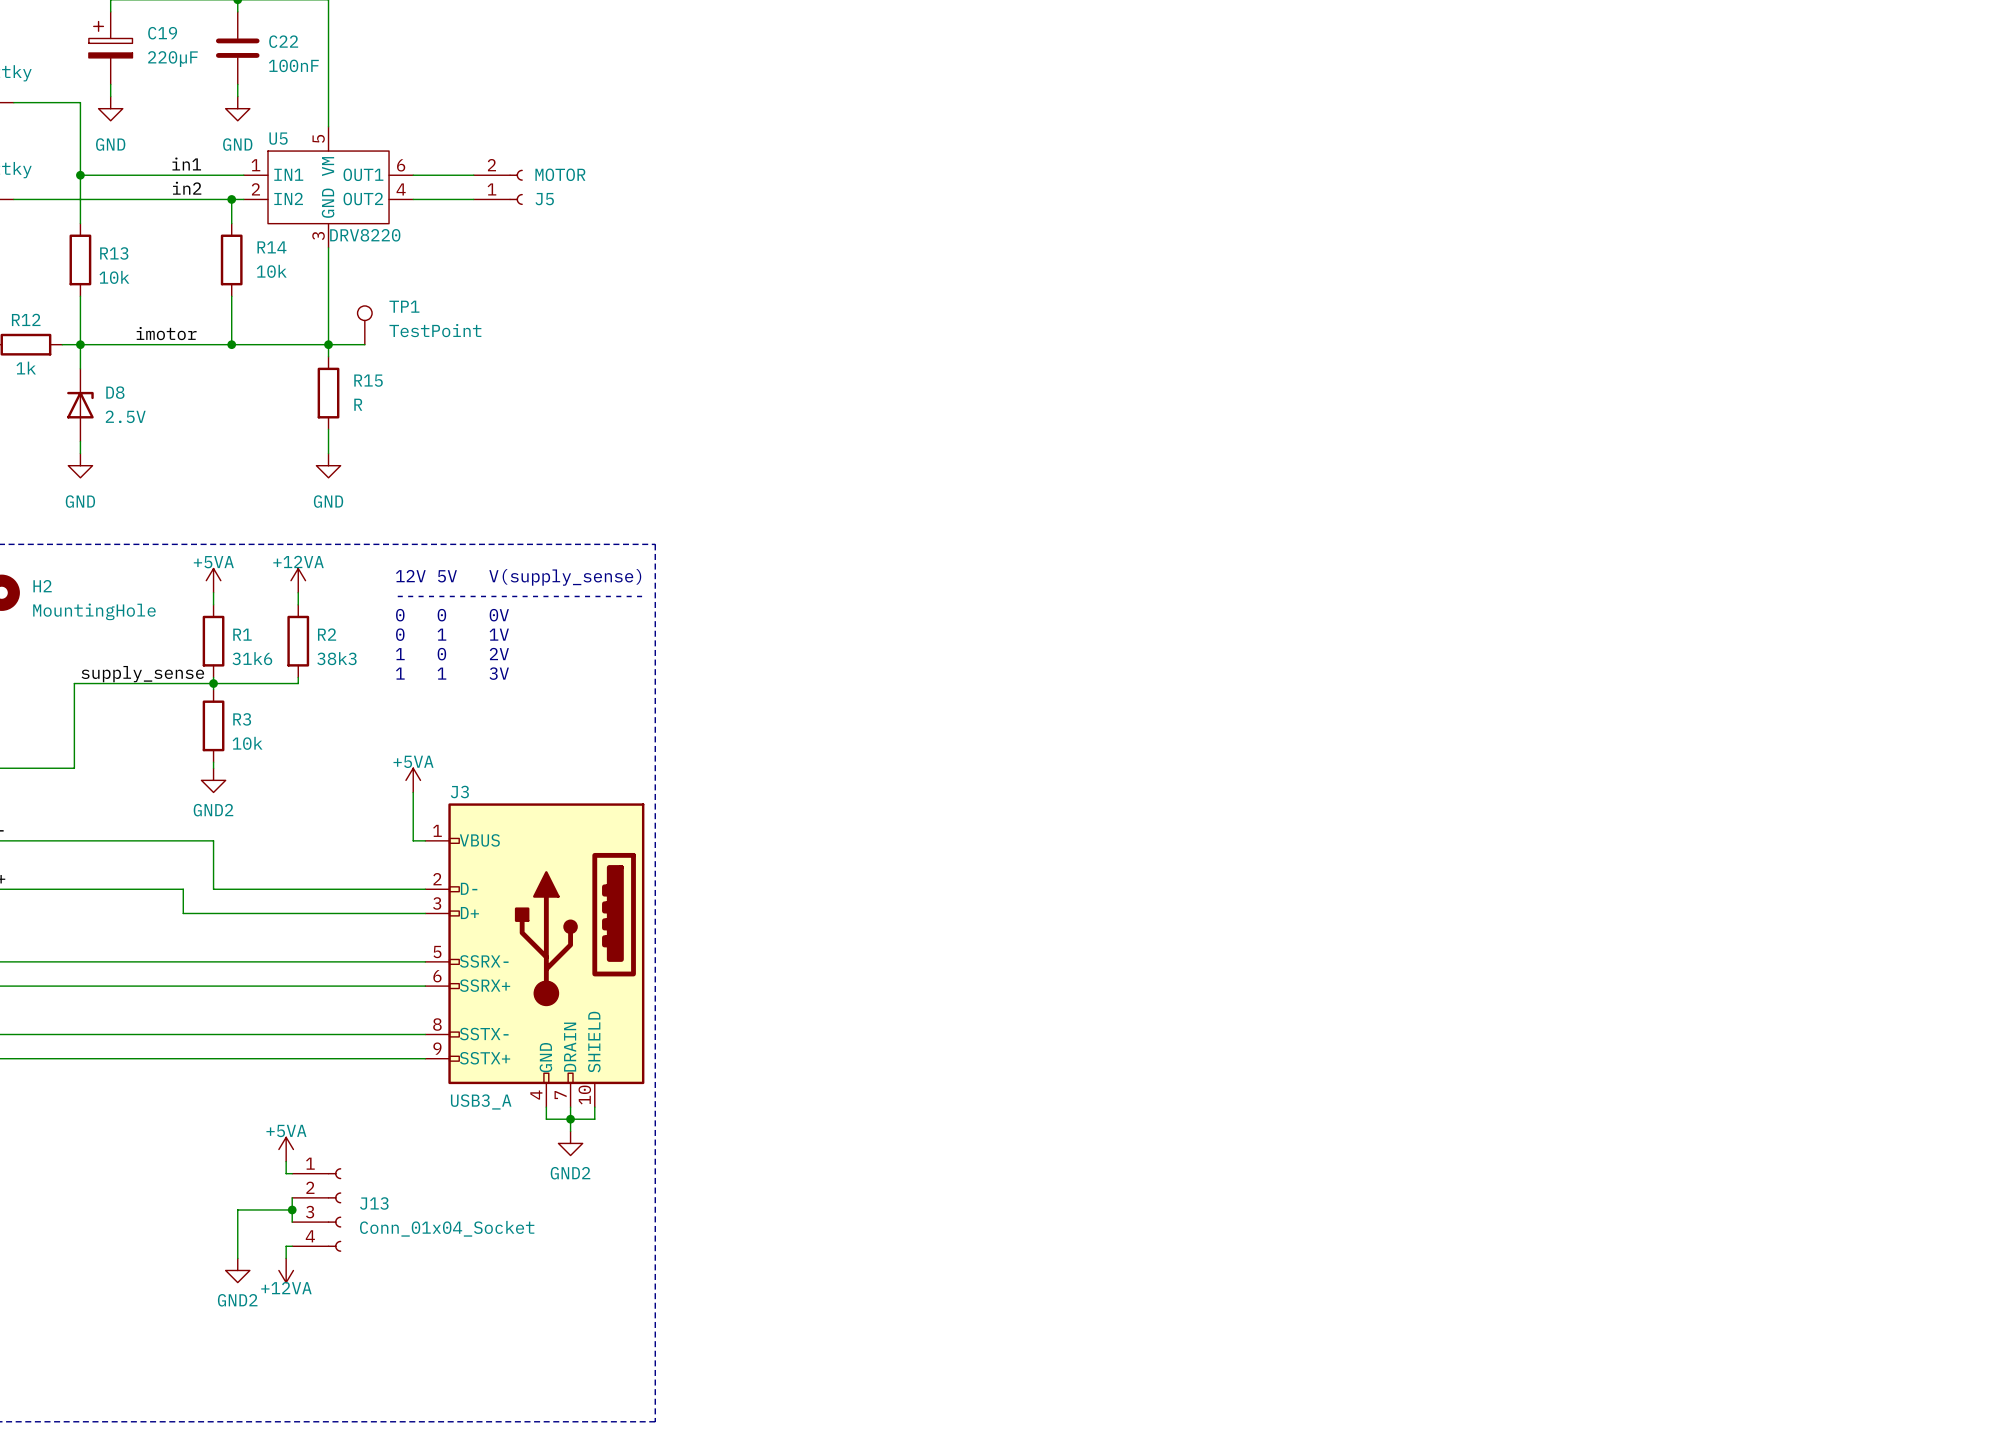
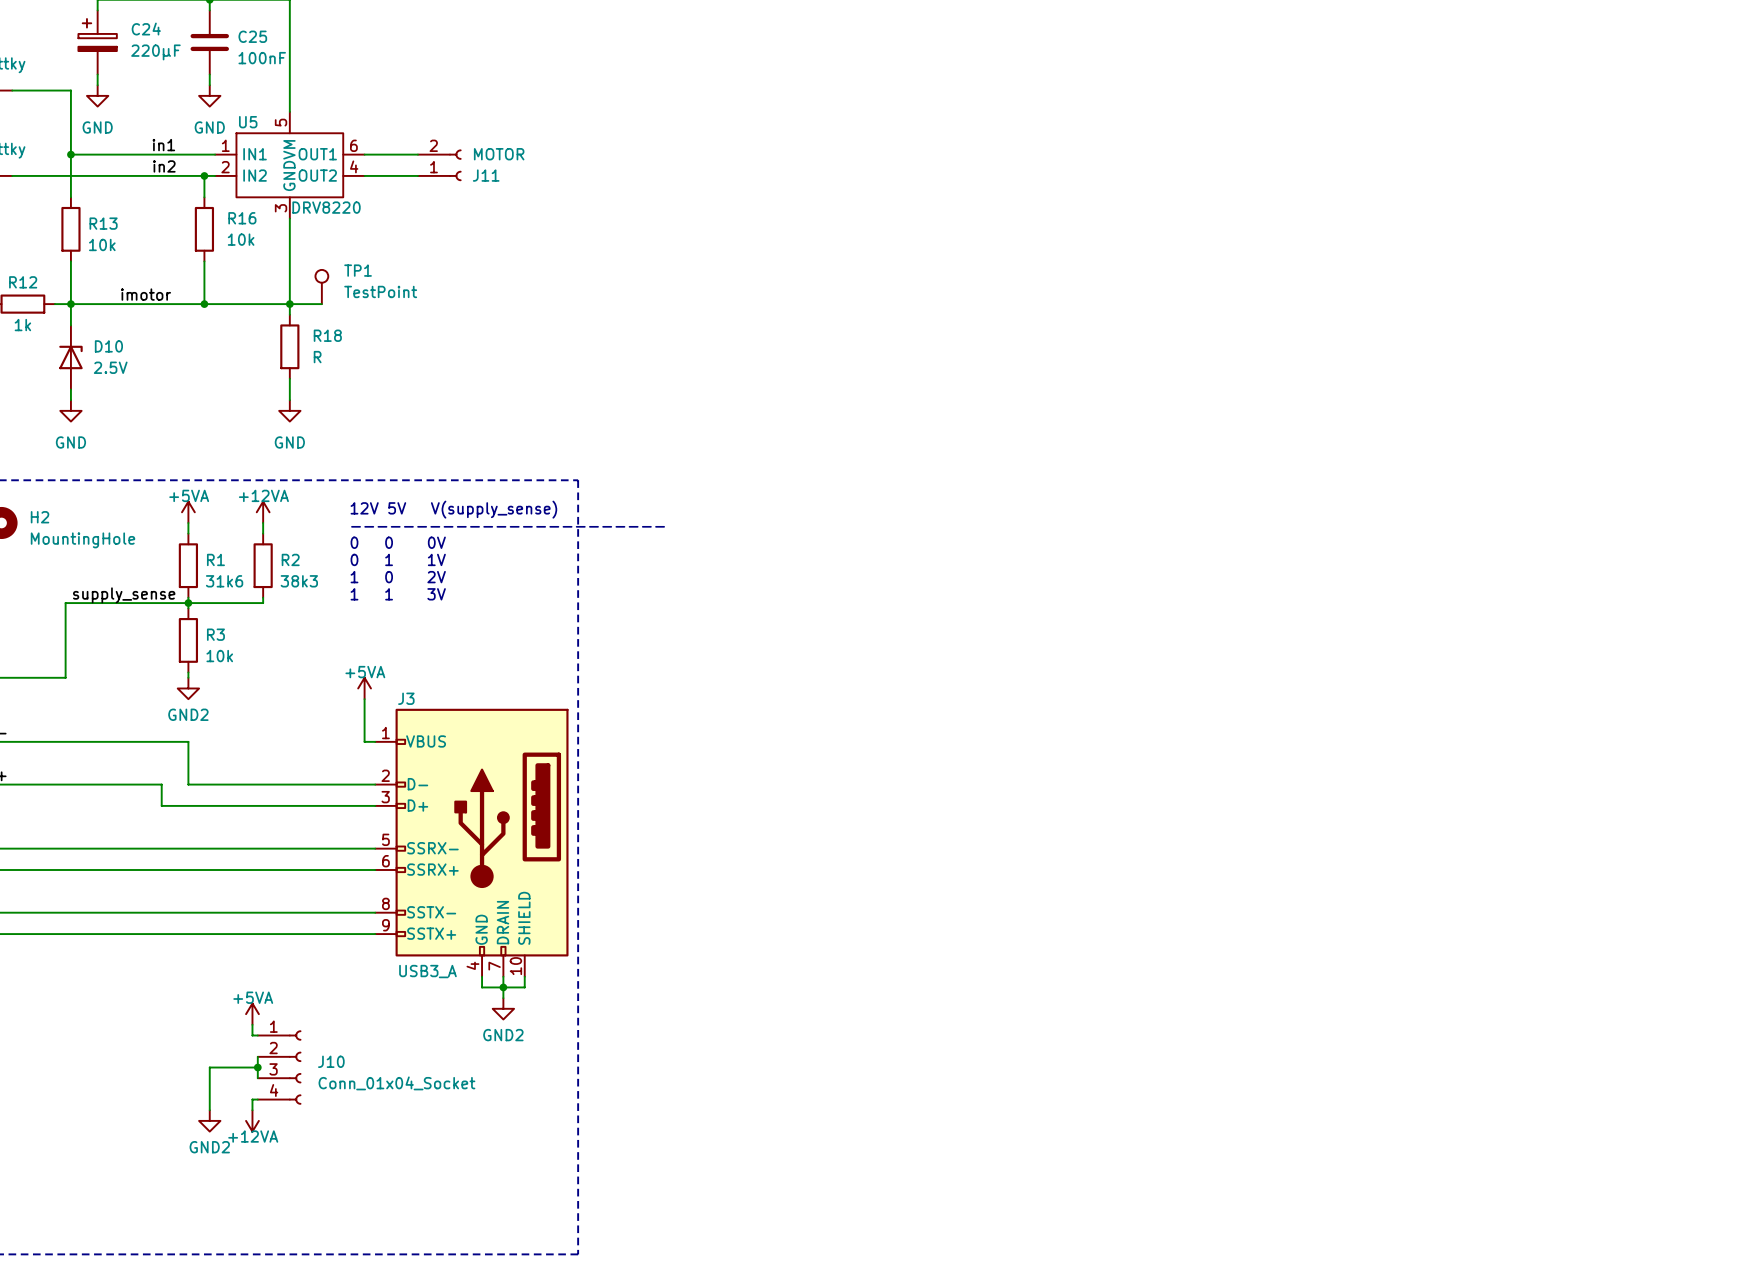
C19 name: C19 (162, 33) -> C24 (146, 29)
C22 name: C22 (283, 41) -> C25 (252, 36)
J5 name: J5 (544, 199) -> J11 (486, 175)
R14 name: R14 (271, 247) -> R16 (242, 218)
R15 name: R15 (368, 380) -> R18 (327, 335)
D8 name: D8 (115, 392) -> D10 (108, 346)
J13 name: J13 (374, 1203) -> J10 (331, 1061)

